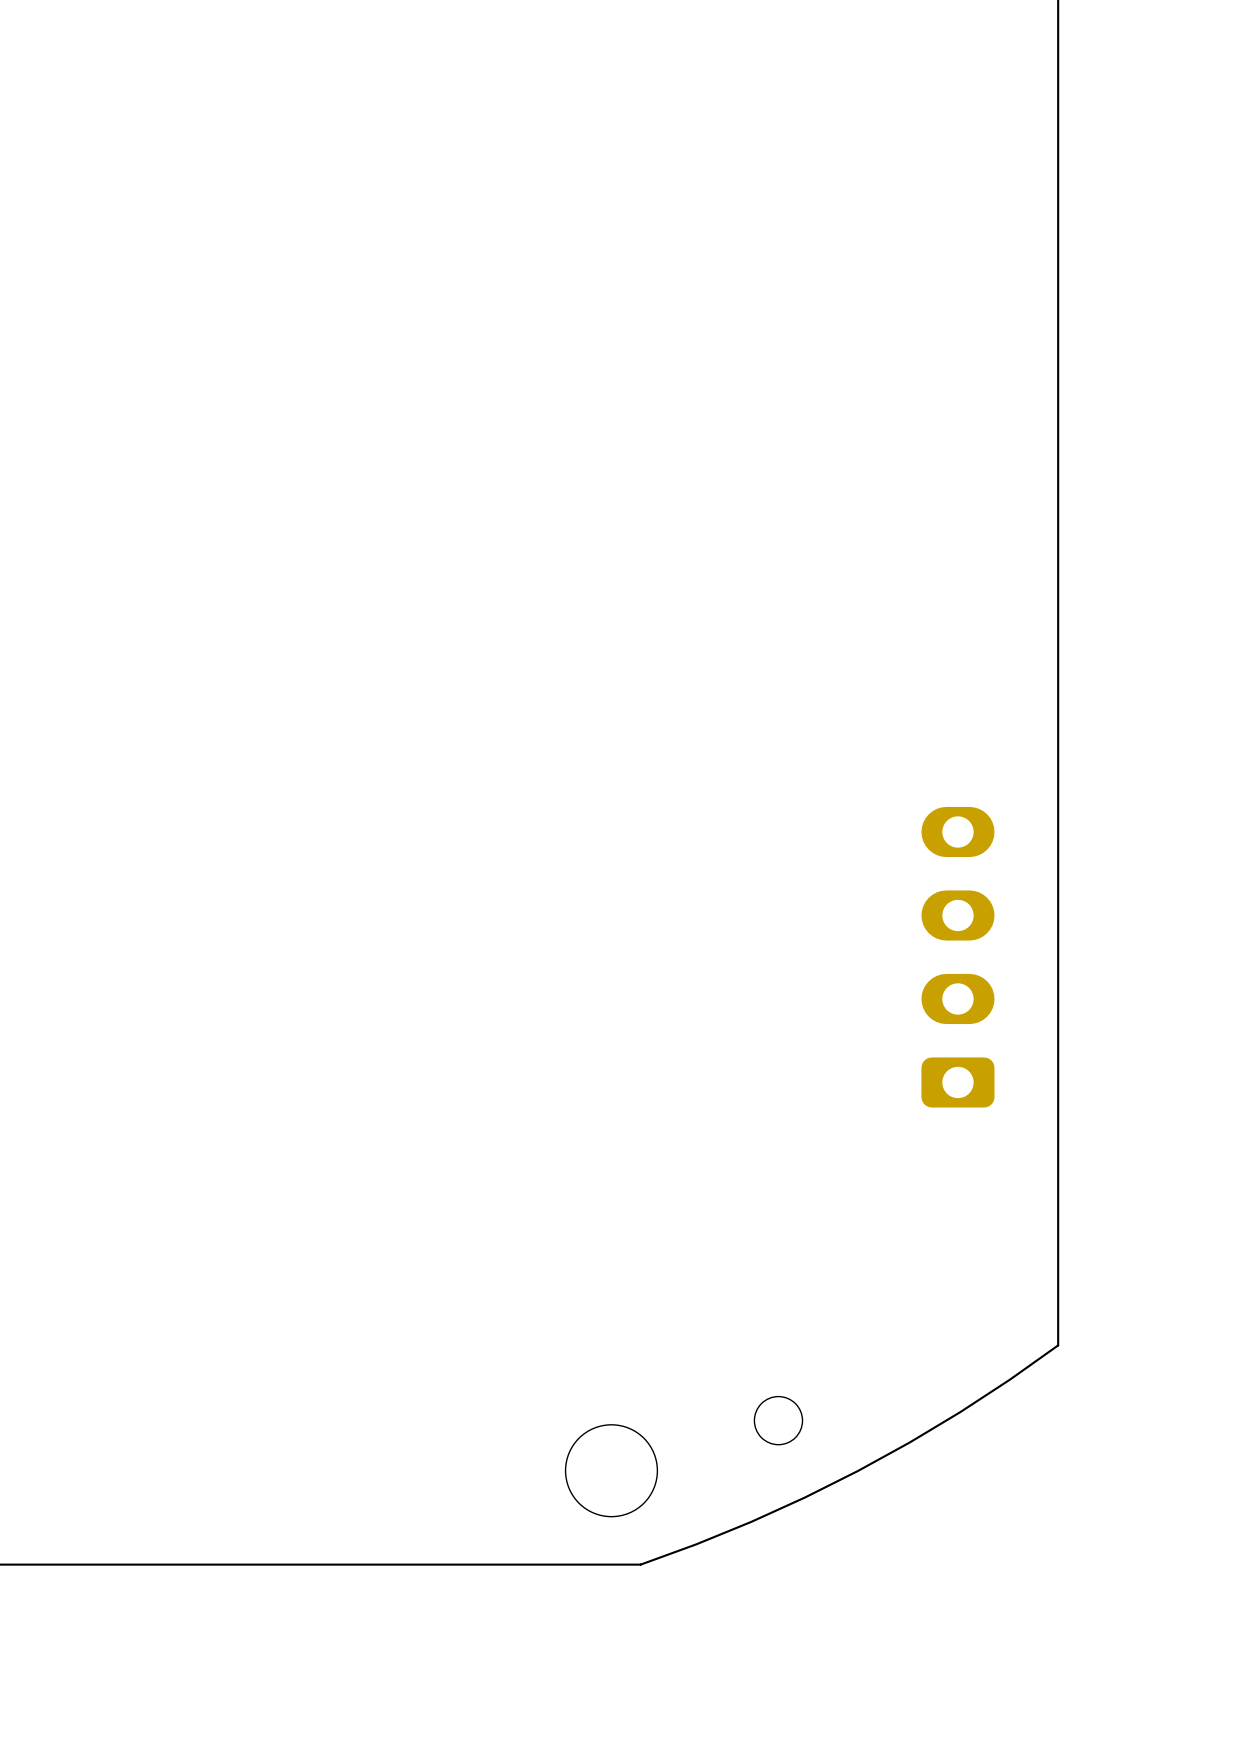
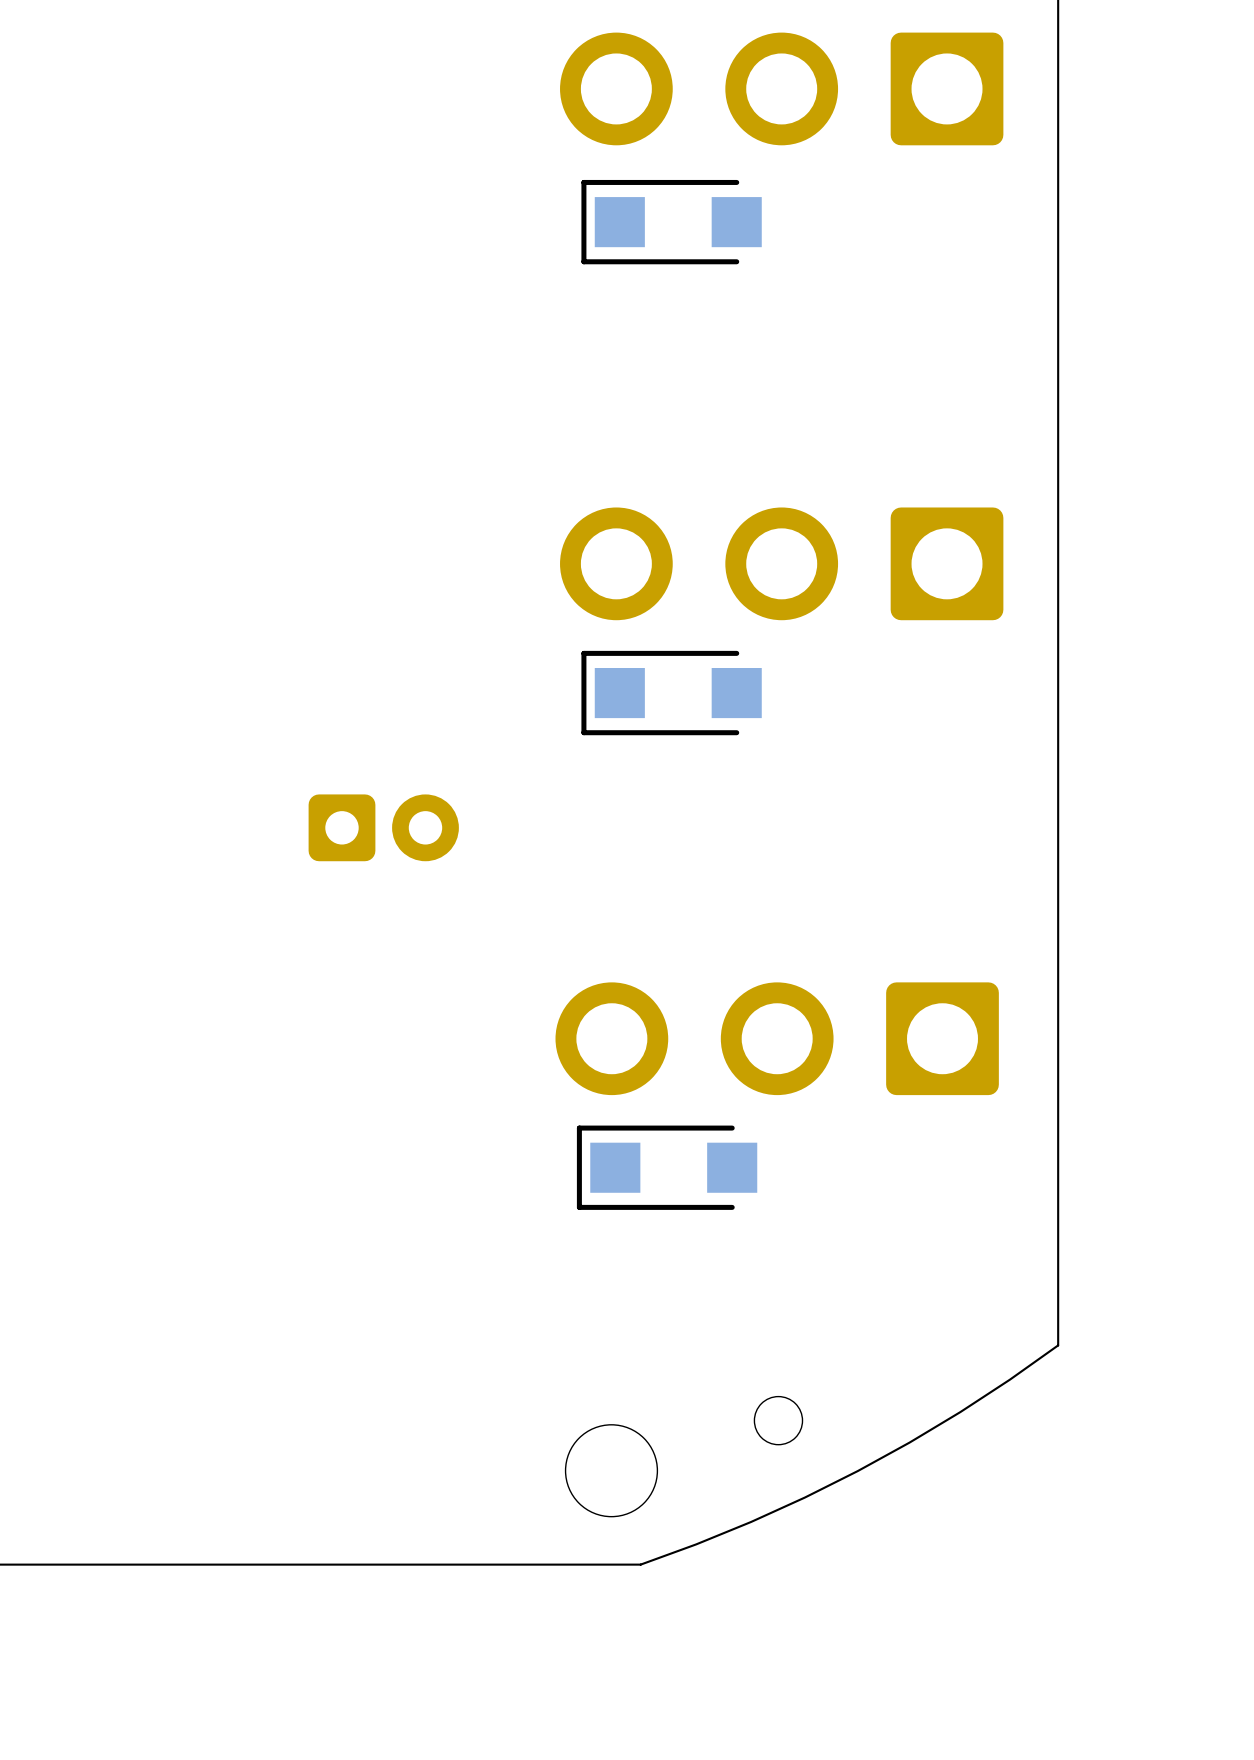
part: none -> (781, 88)
part: none -> (671, 222)
part: none -> (781, 563)
part: none -> (671, 693)
part: none -> (383, 827)
part: (957, 957) -> none
part: none -> (777, 1038)
part: none -> (667, 1167)

